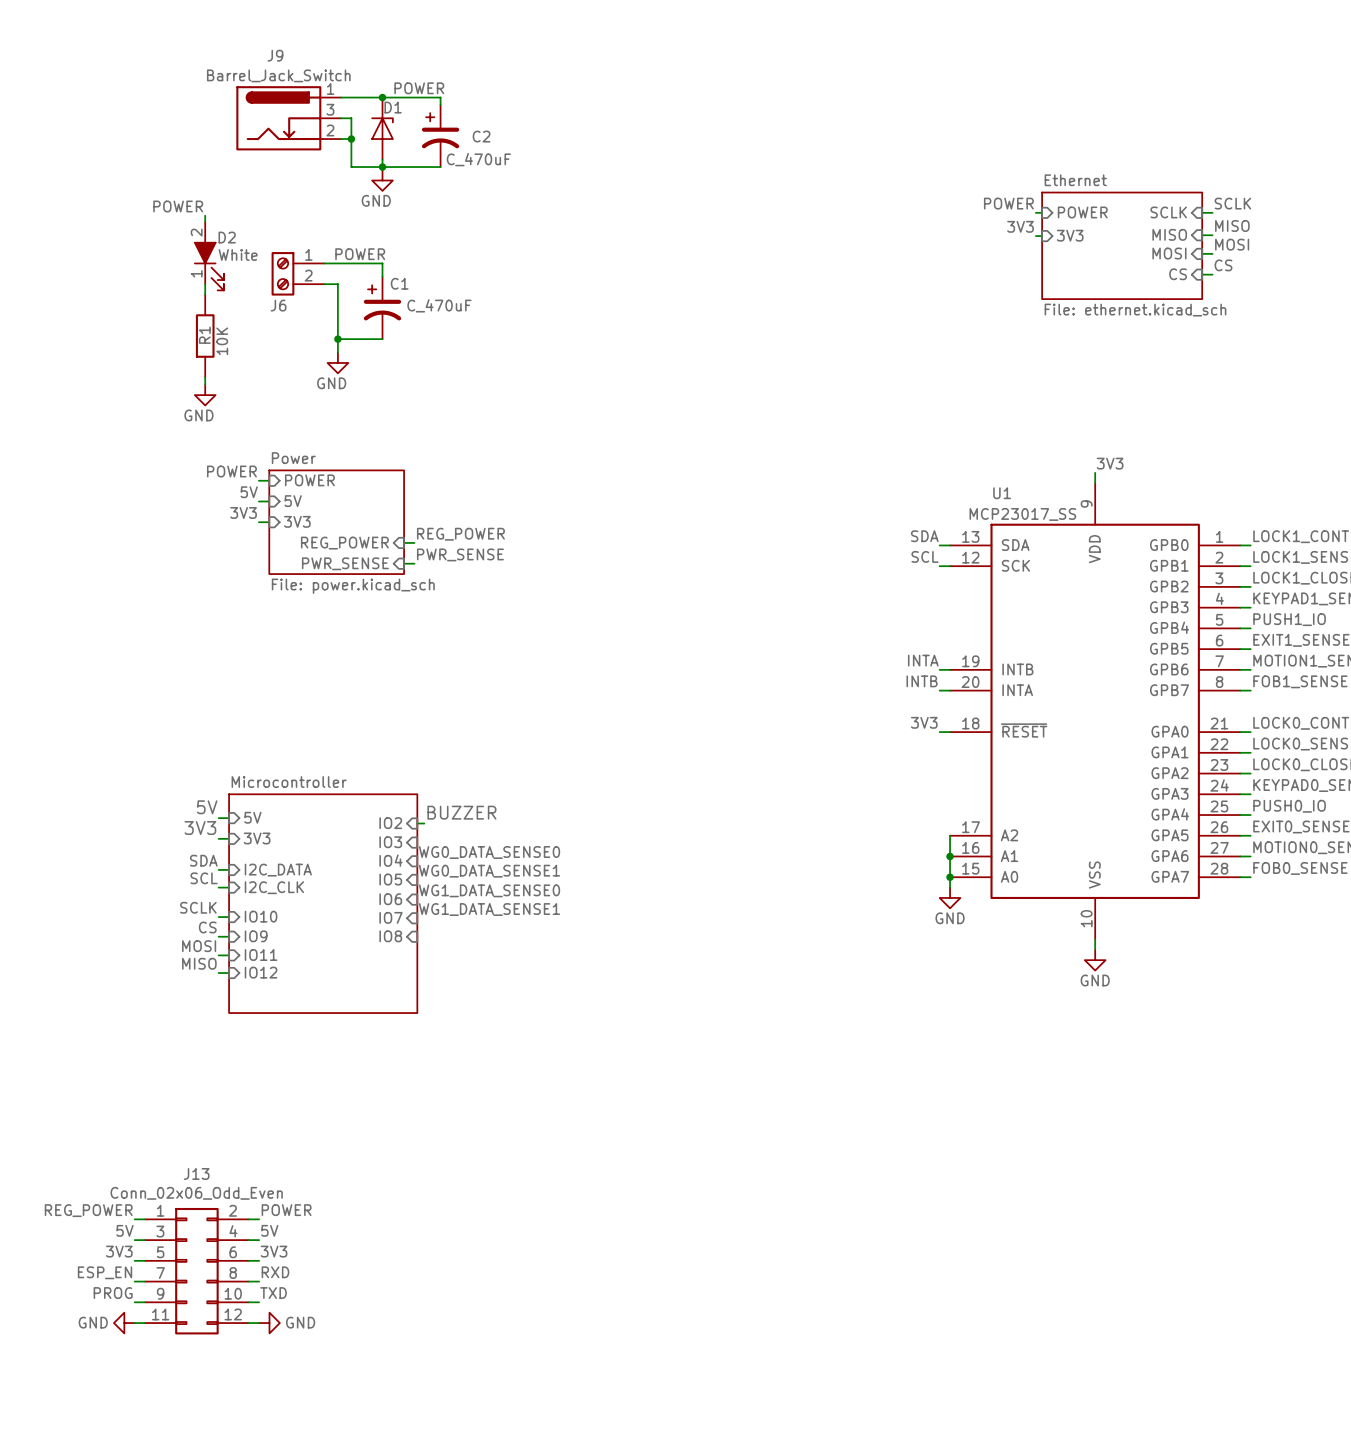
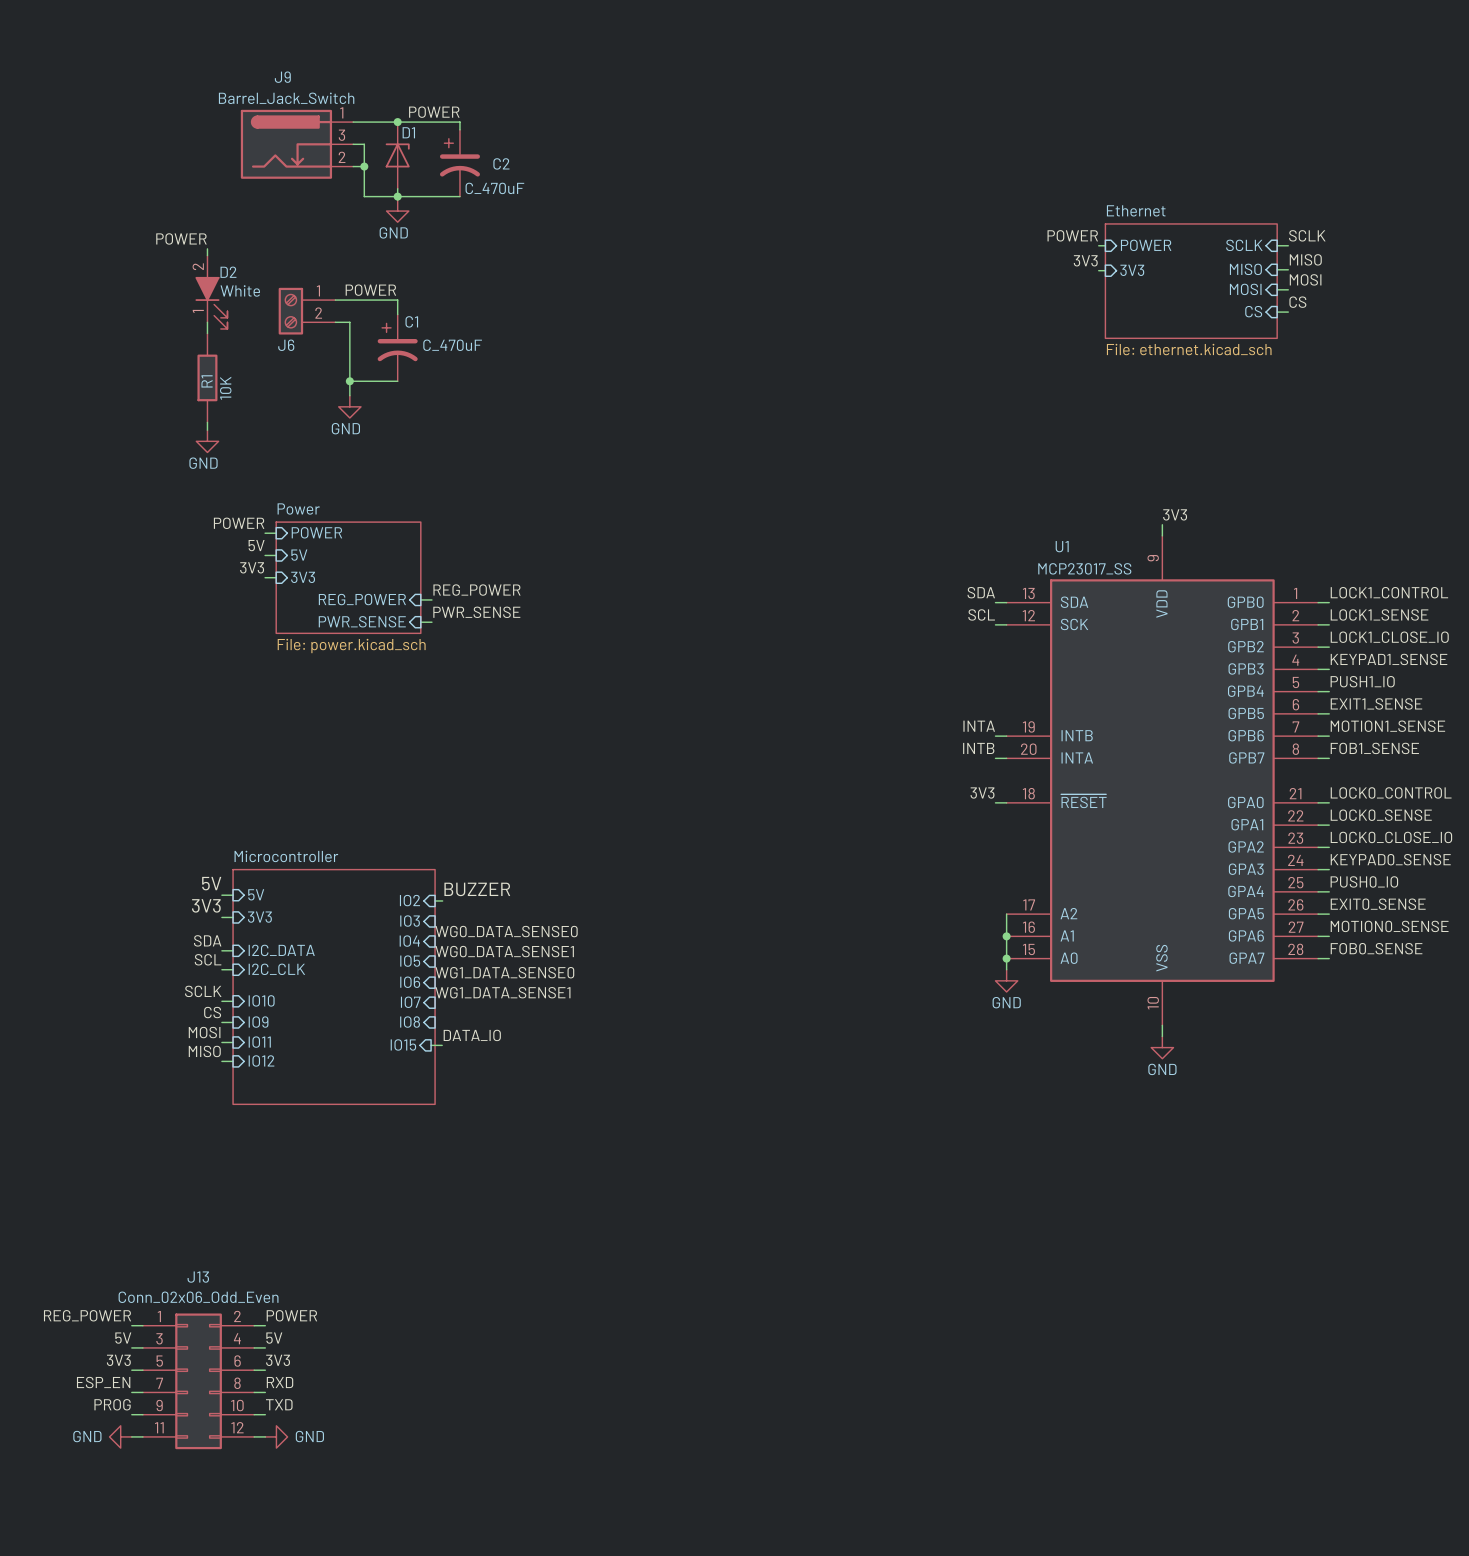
label: none -> DATA_IO (472, 1035)
sheet pin: none -> IO15 (403, 1044)
wire: none -> (431, 1045) (442, 1045)

